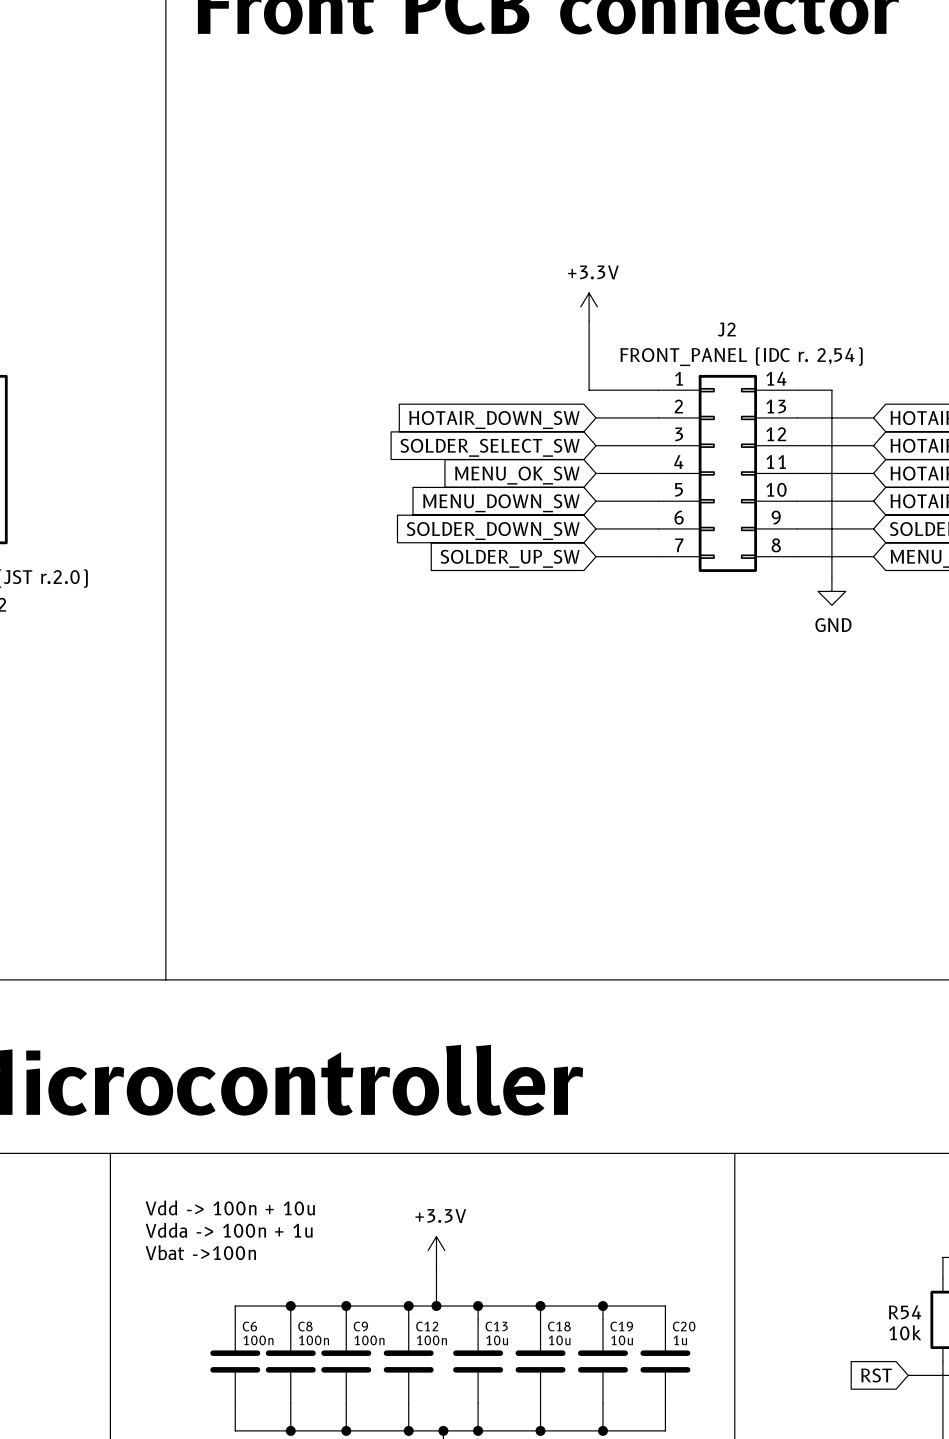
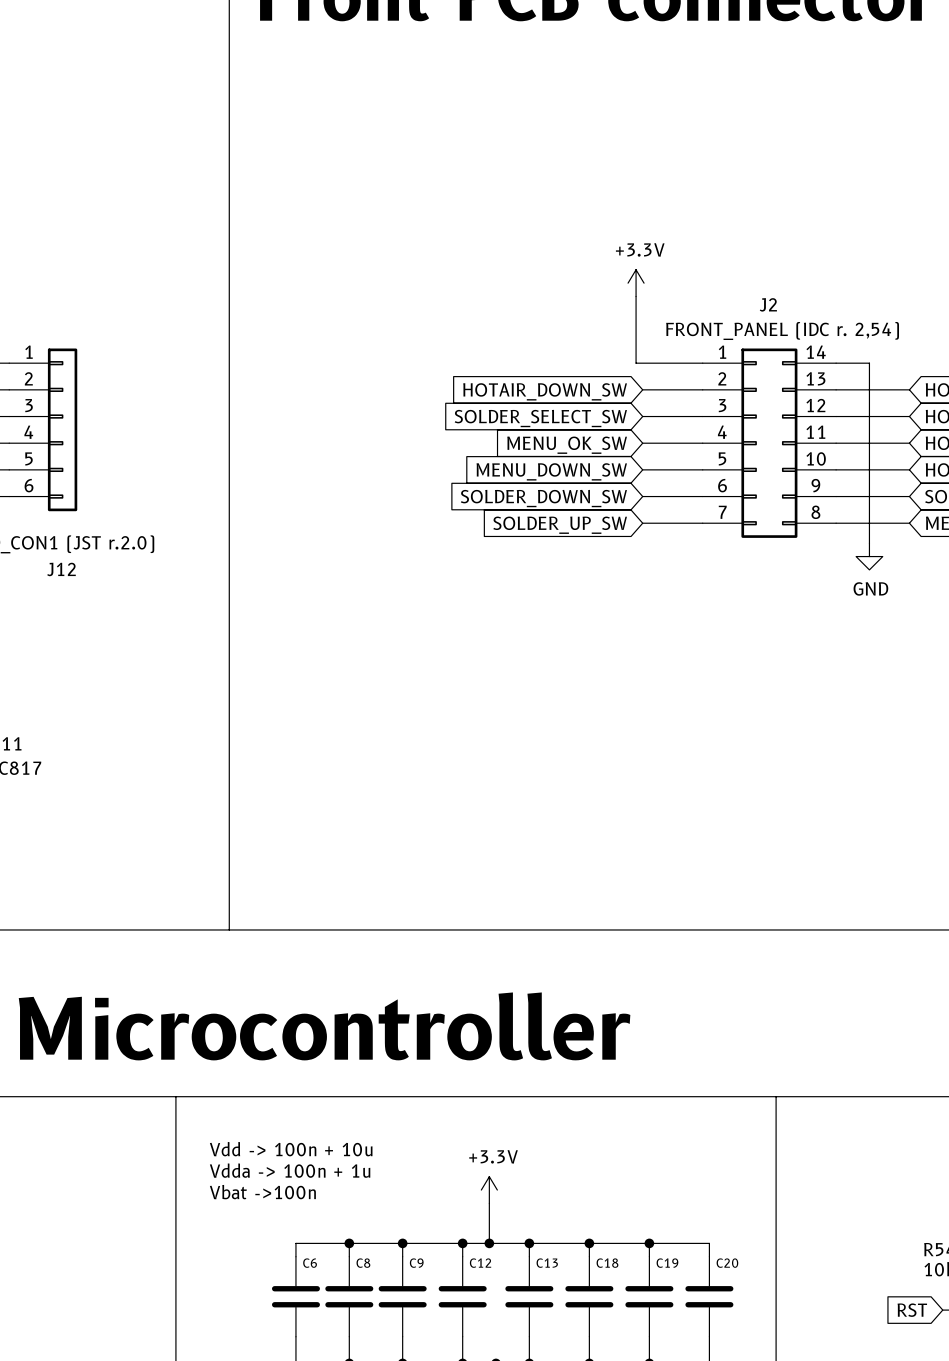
C6 value: 100n (258, 1340) -> none
C8 value: 100n (313, 1340) -> none
C9 value: 100n (369, 1340) -> none
C12 value: 100n (431, 1340) -> none
C13 value: 10u (497, 1340) -> none
C18 value: 10u (559, 1340) -> none
C19 value: 10u (622, 1340) -> none
C20 value: 1u (680, 1340) -> none

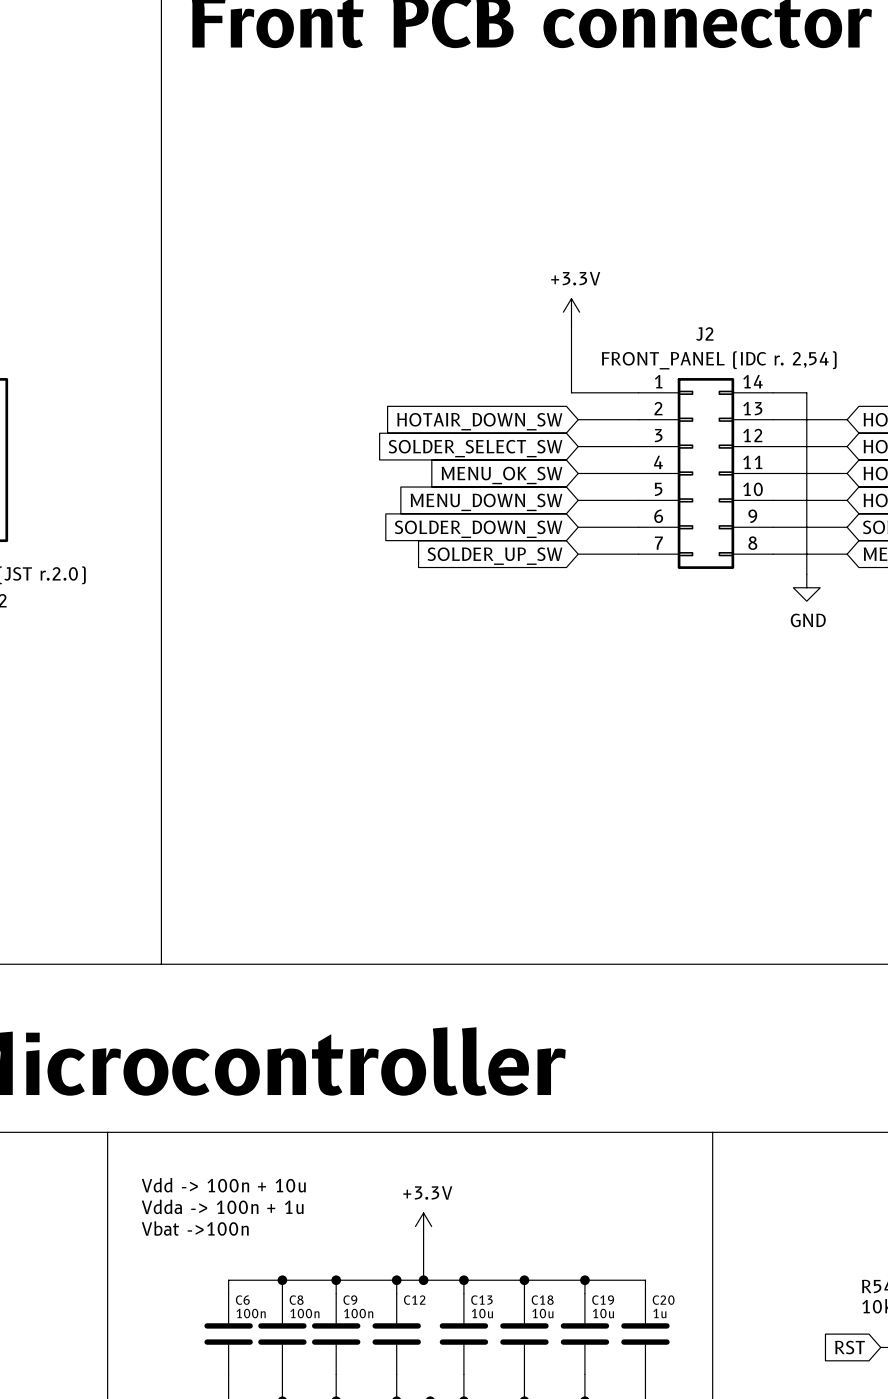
C6 value: none -> 100n (251, 1313)
C8 value: none -> 100n (304, 1313)
C9 value: none -> 100n (358, 1313)
C13 value: none -> 10u (482, 1313)
C18 value: none -> 10u (542, 1313)
C19 value: none -> 10u (603, 1313)
C20 value: none -> 1u (659, 1313)

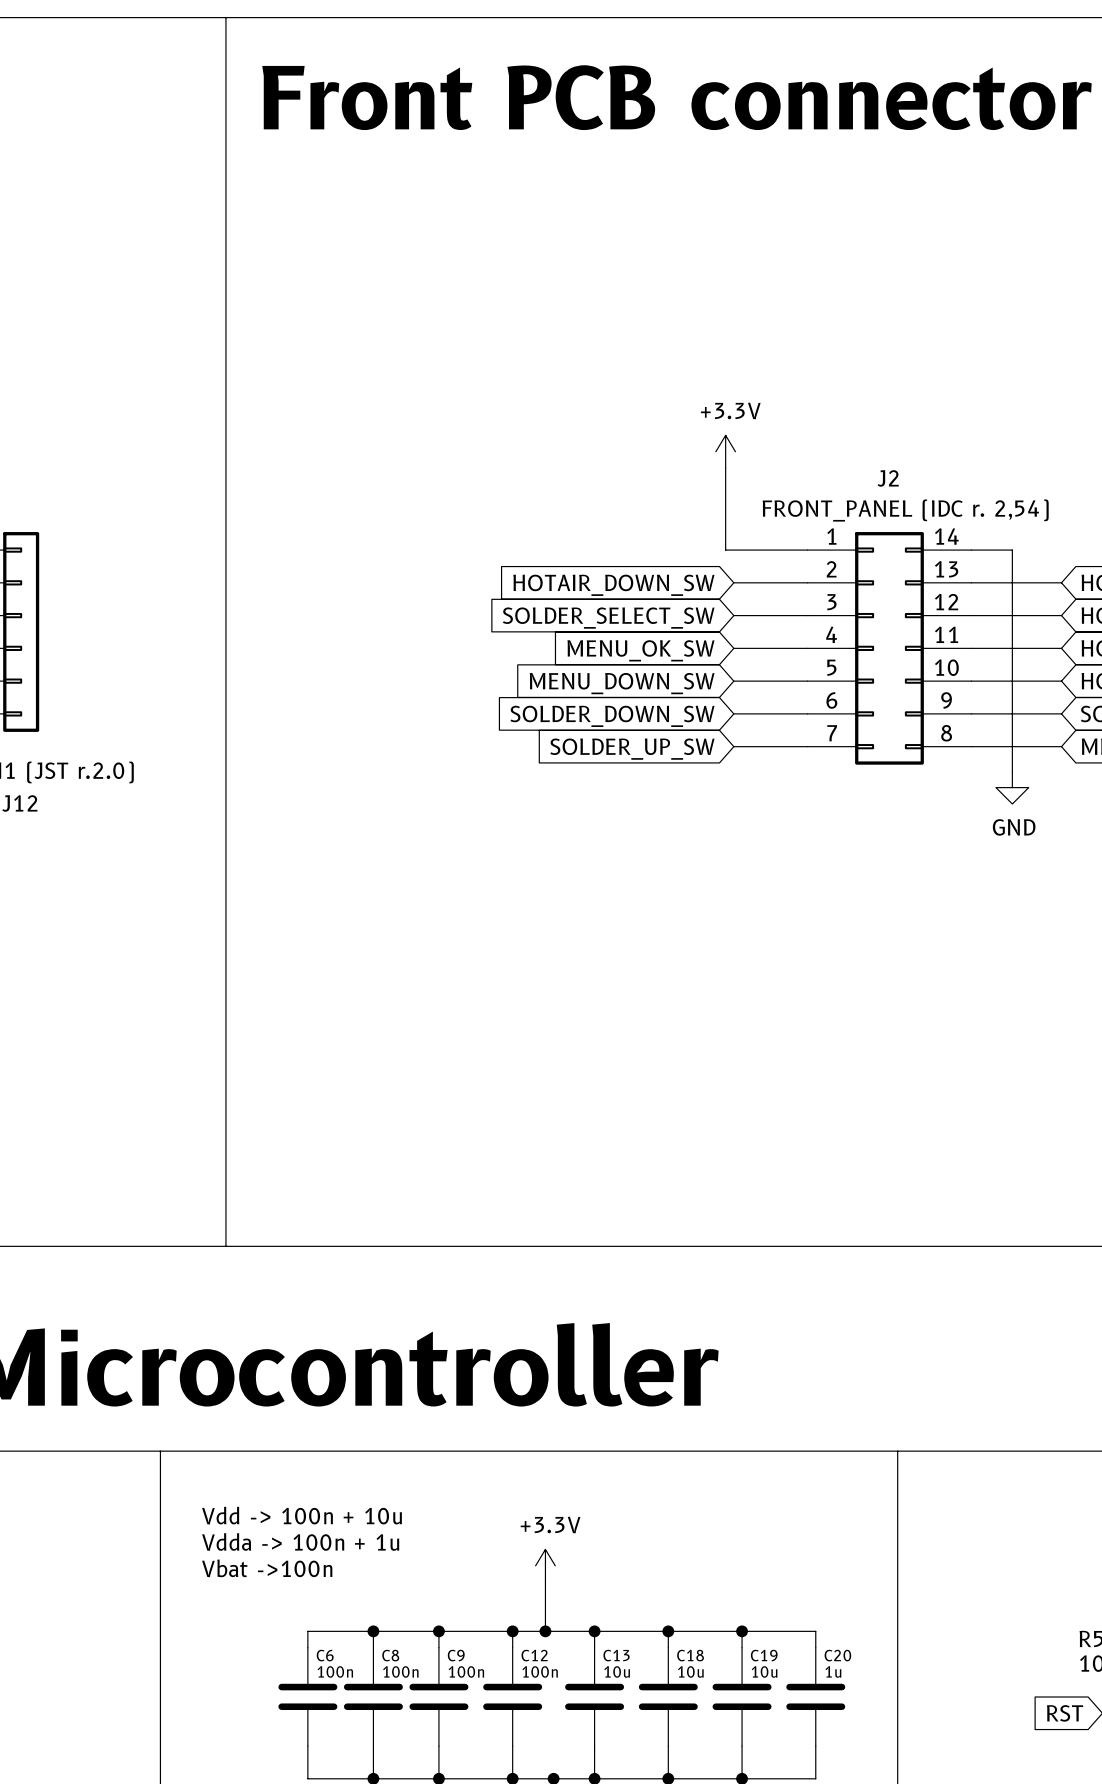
C12 value: none -> 100n (540, 1671)

